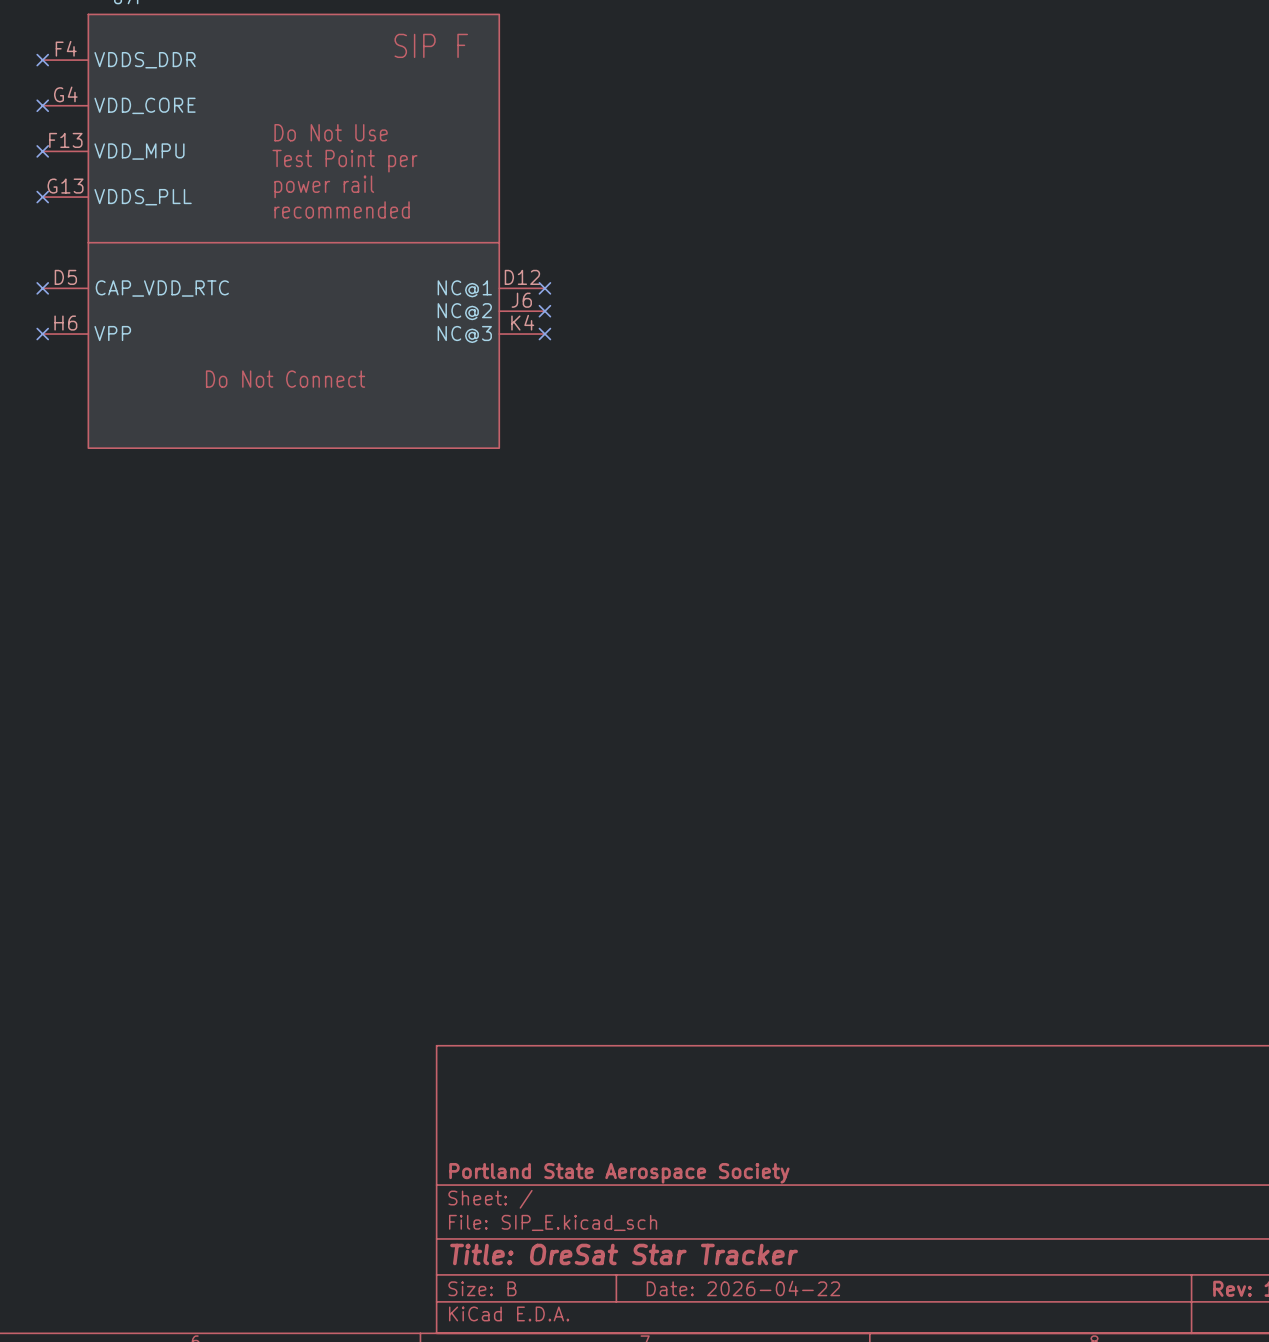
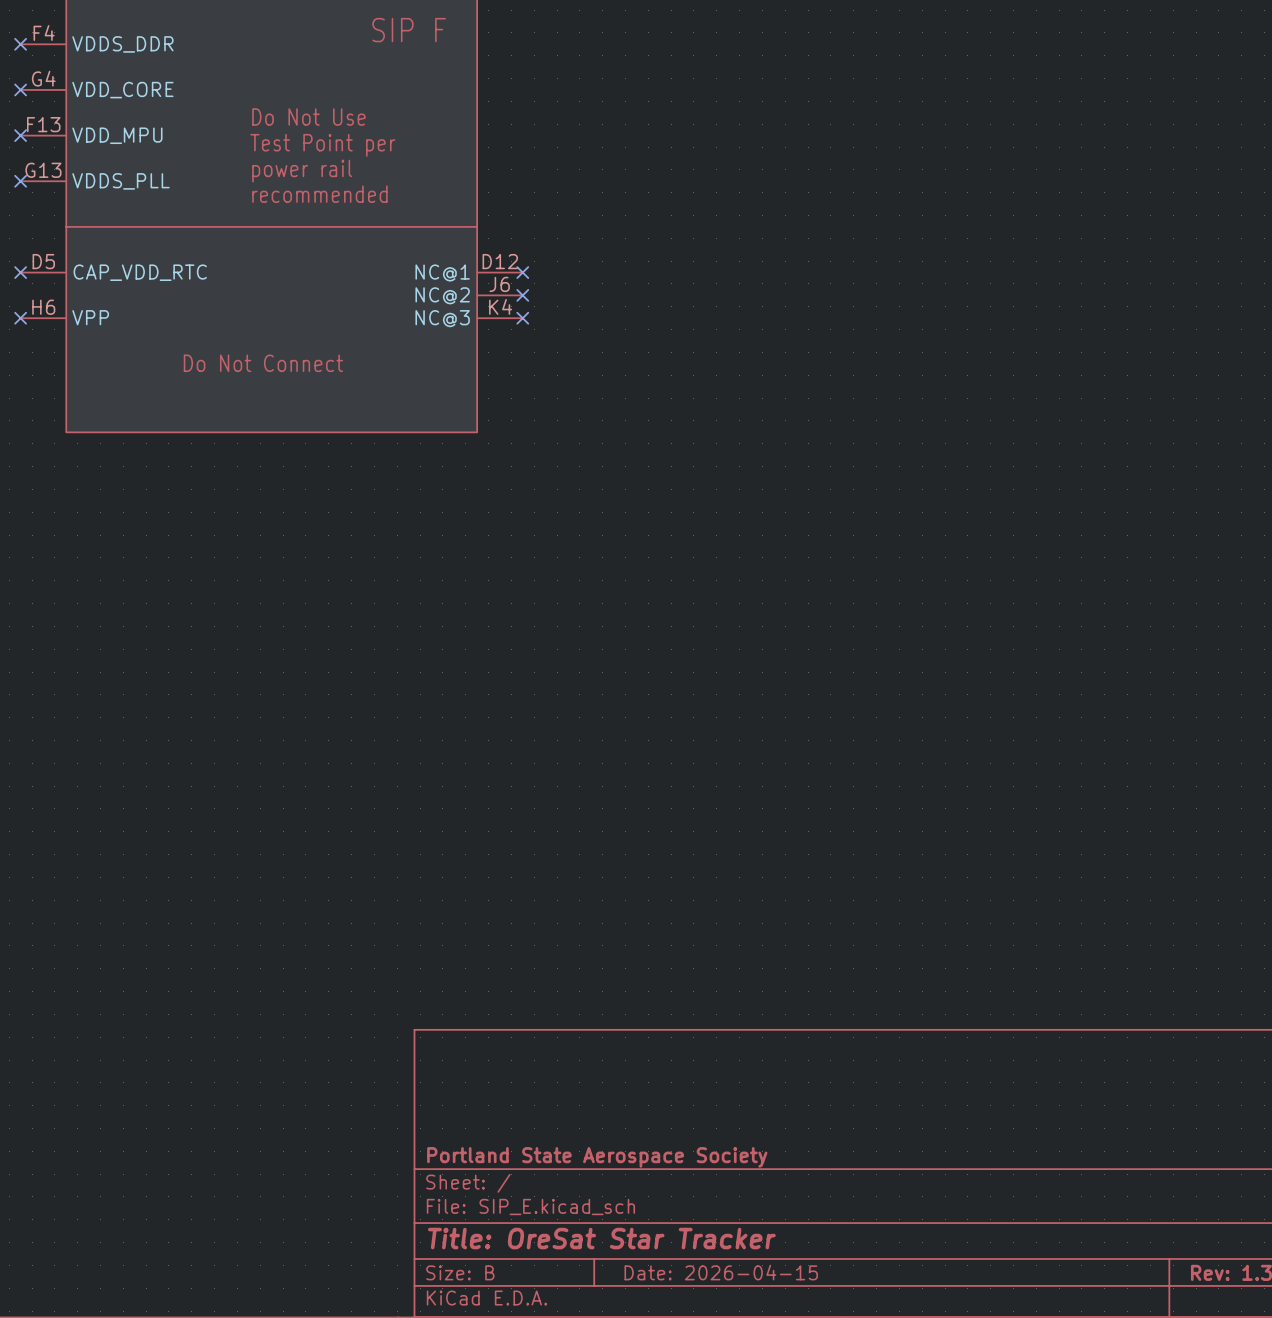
title block: Date: 2026-04-22 (743, 1288) -> Date: 2026-04-15 (721, 1272)

